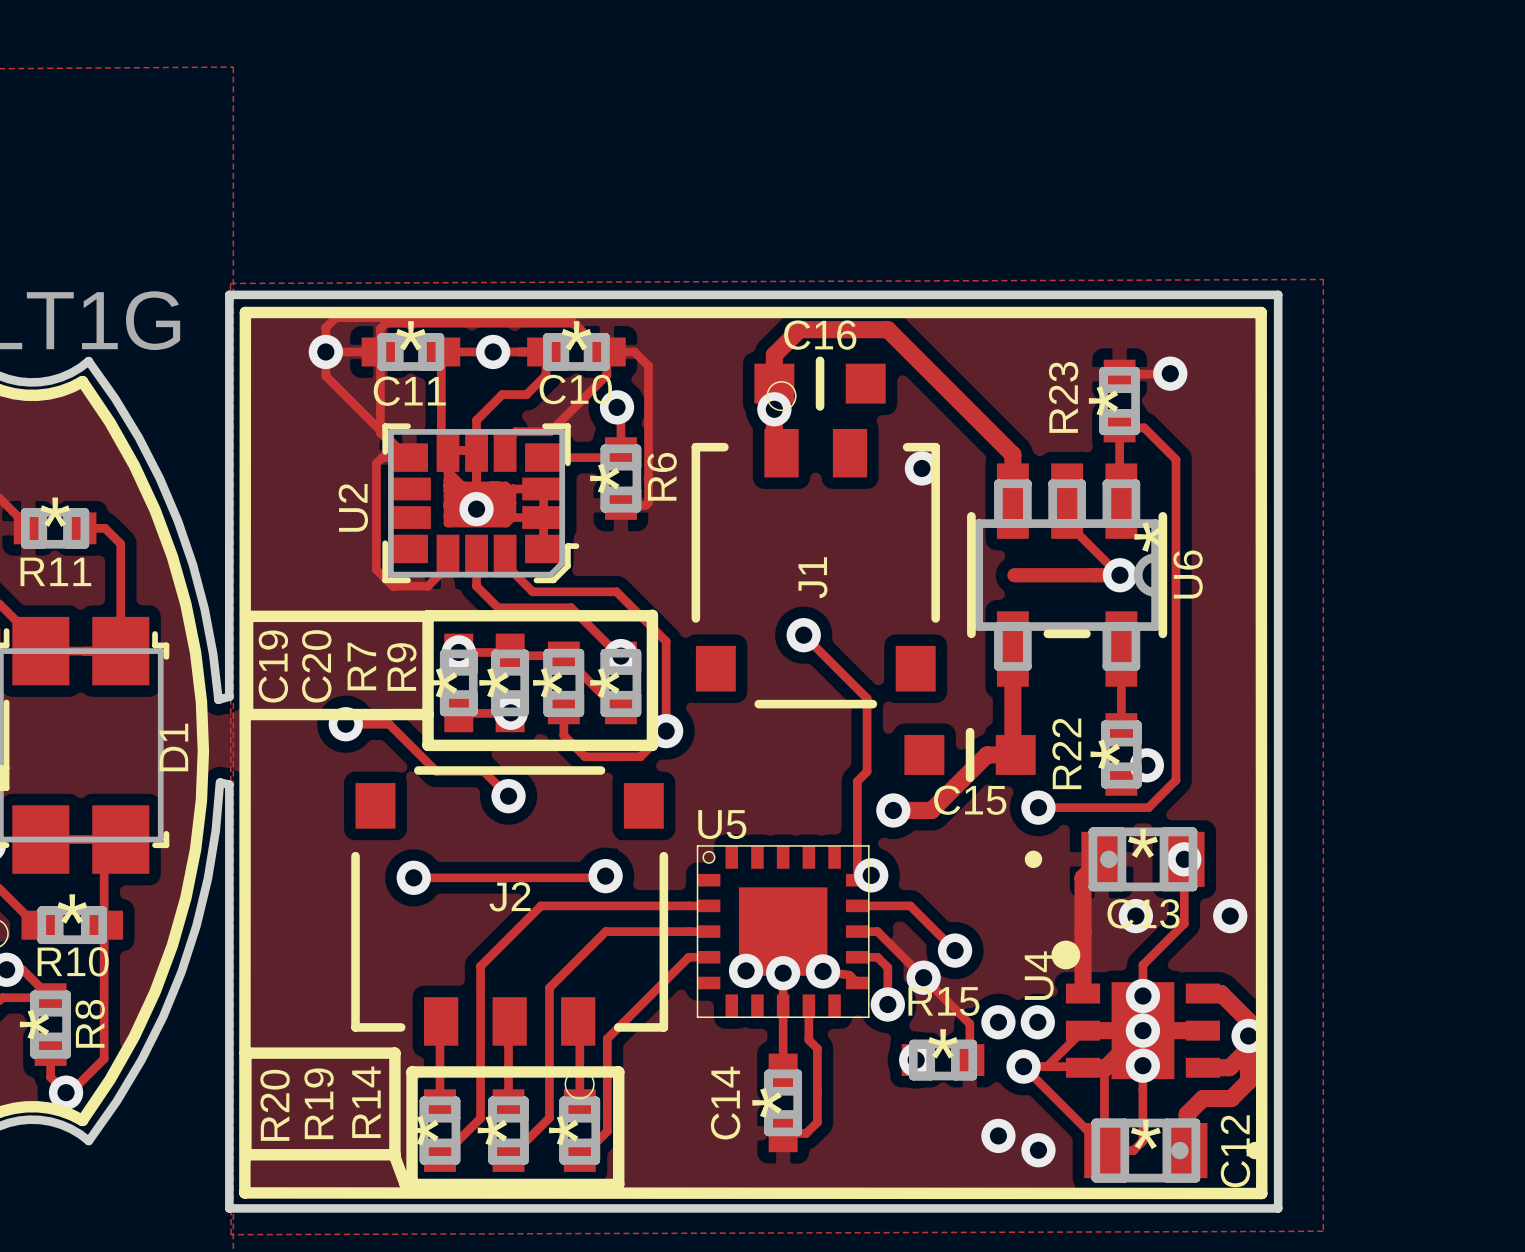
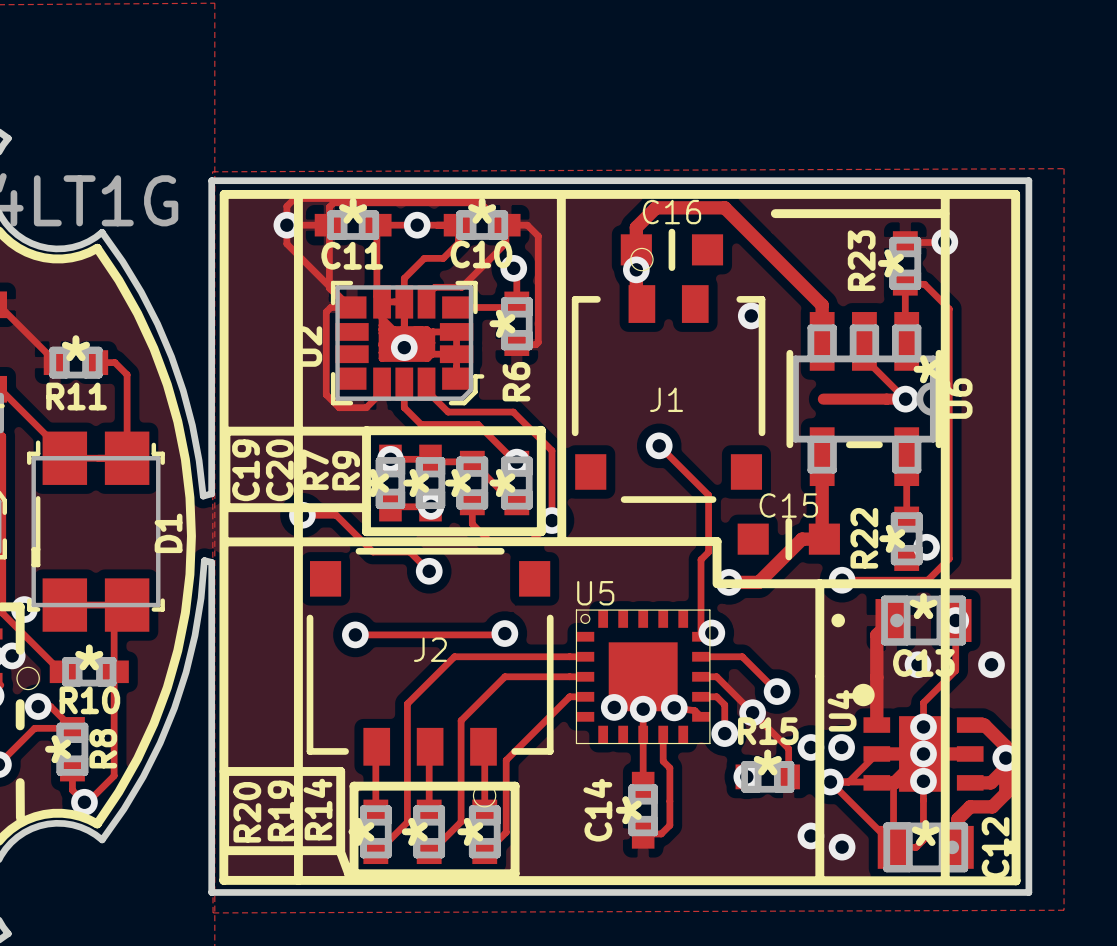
line: none -> (298, 195) (298, 880)
line: none -> (945, 194) (945, 880)
line: none -> (561, 197) (561, 541)
line: none -> (775, 213) (944, 213)
R6 name position: R6 (662, 476) -> R6 (516, 381)
J1 name rotation: 0° (812, 577) -> 90° clockwise (666, 399)
line: none -> (225, 541) (717, 541) (717, 583)
C15 name position: C15 (970, 800) -> C15 (788, 505)
line: none -> (718, 583) (1013, 583)
line: none -> (819, 583) (819, 675)
line: none -> (819, 676) (819, 879)

